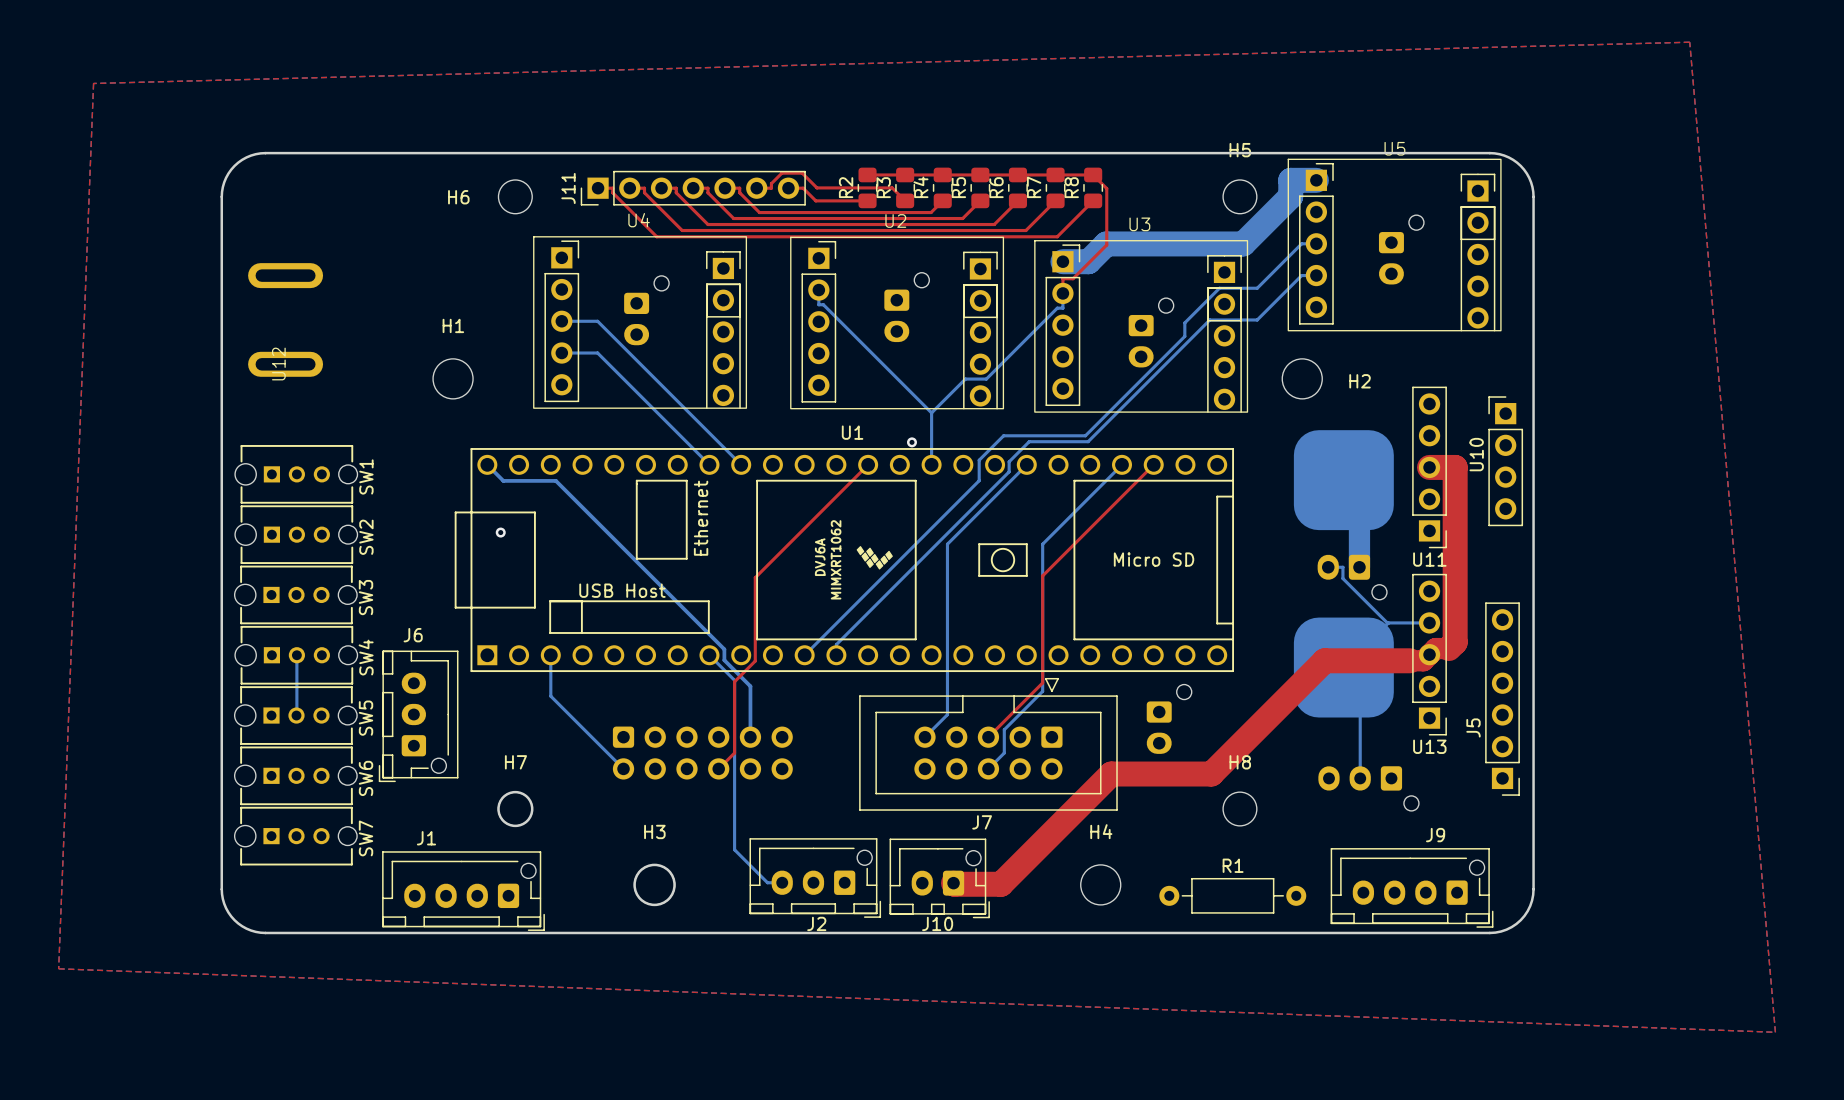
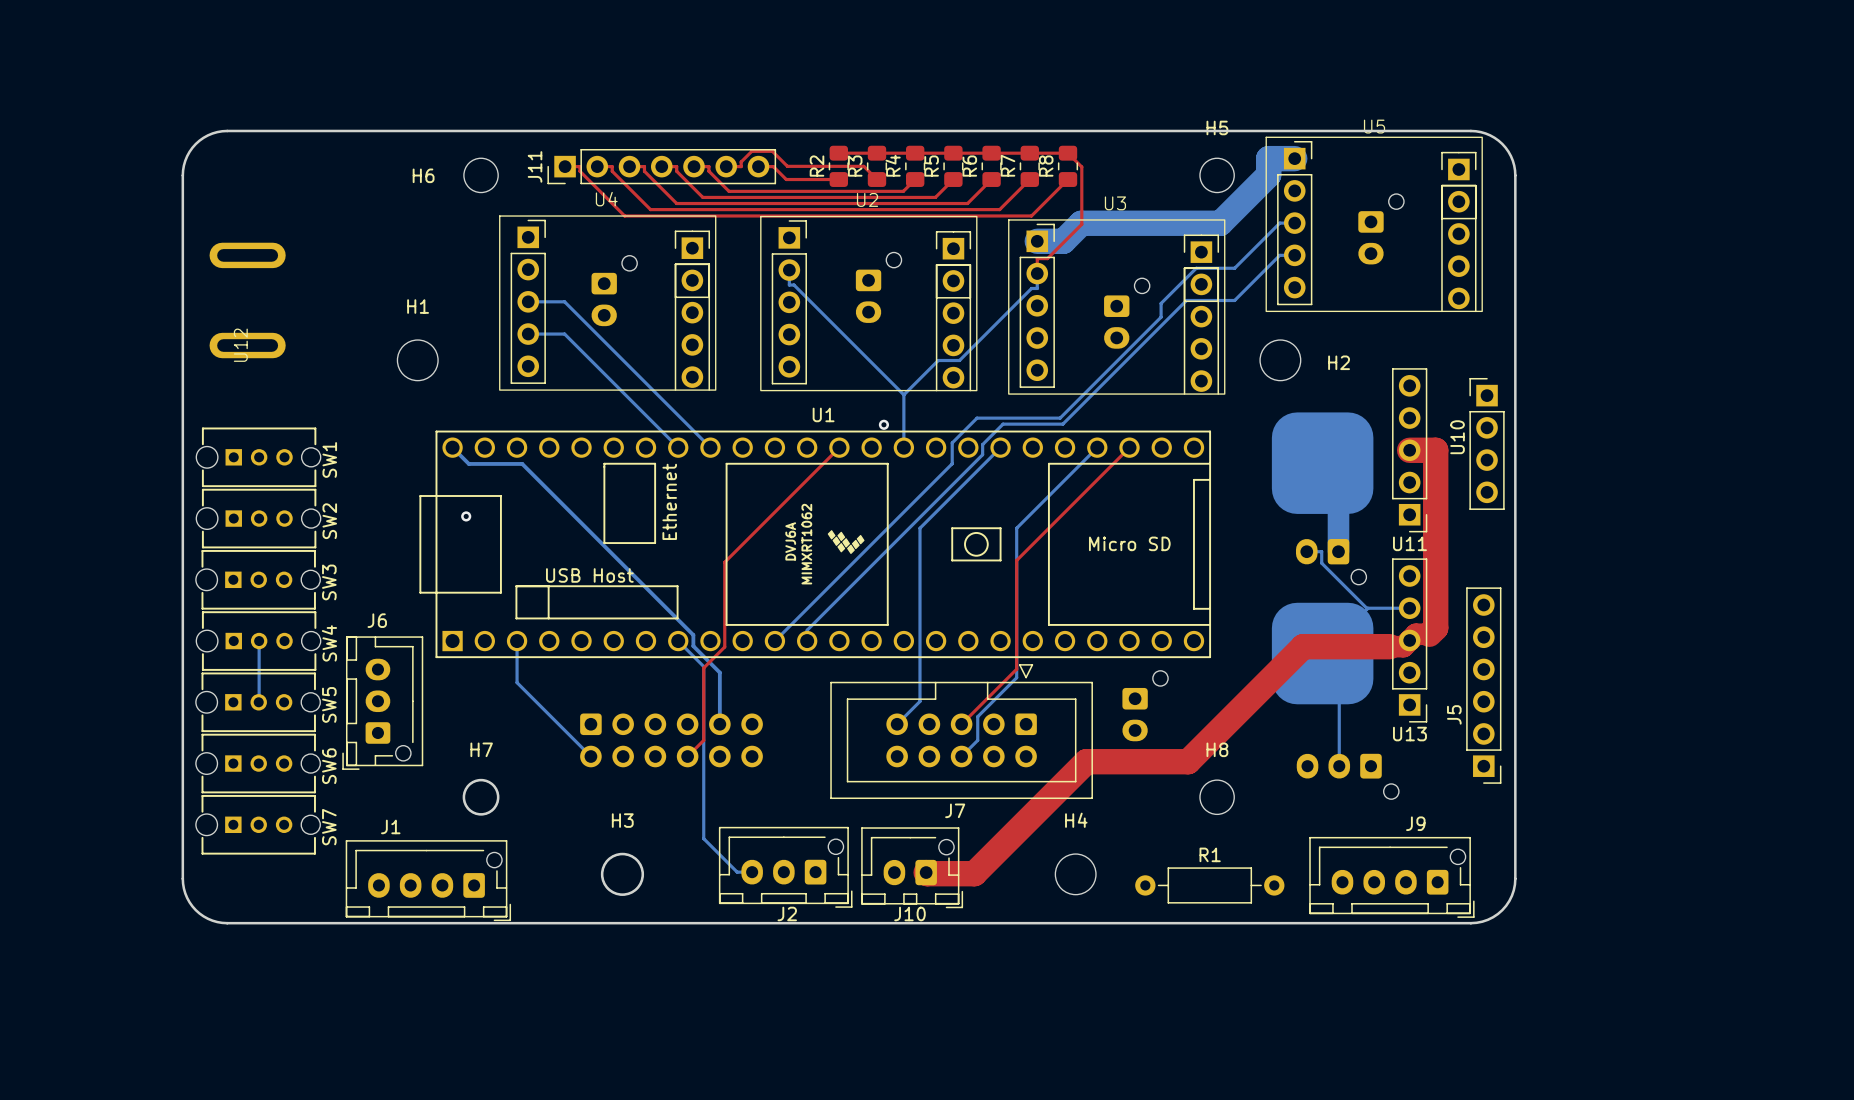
top zone outline: (1689, 42) (1775, 1032) (58, 968) (93, 83) (1689, 42) -> none

